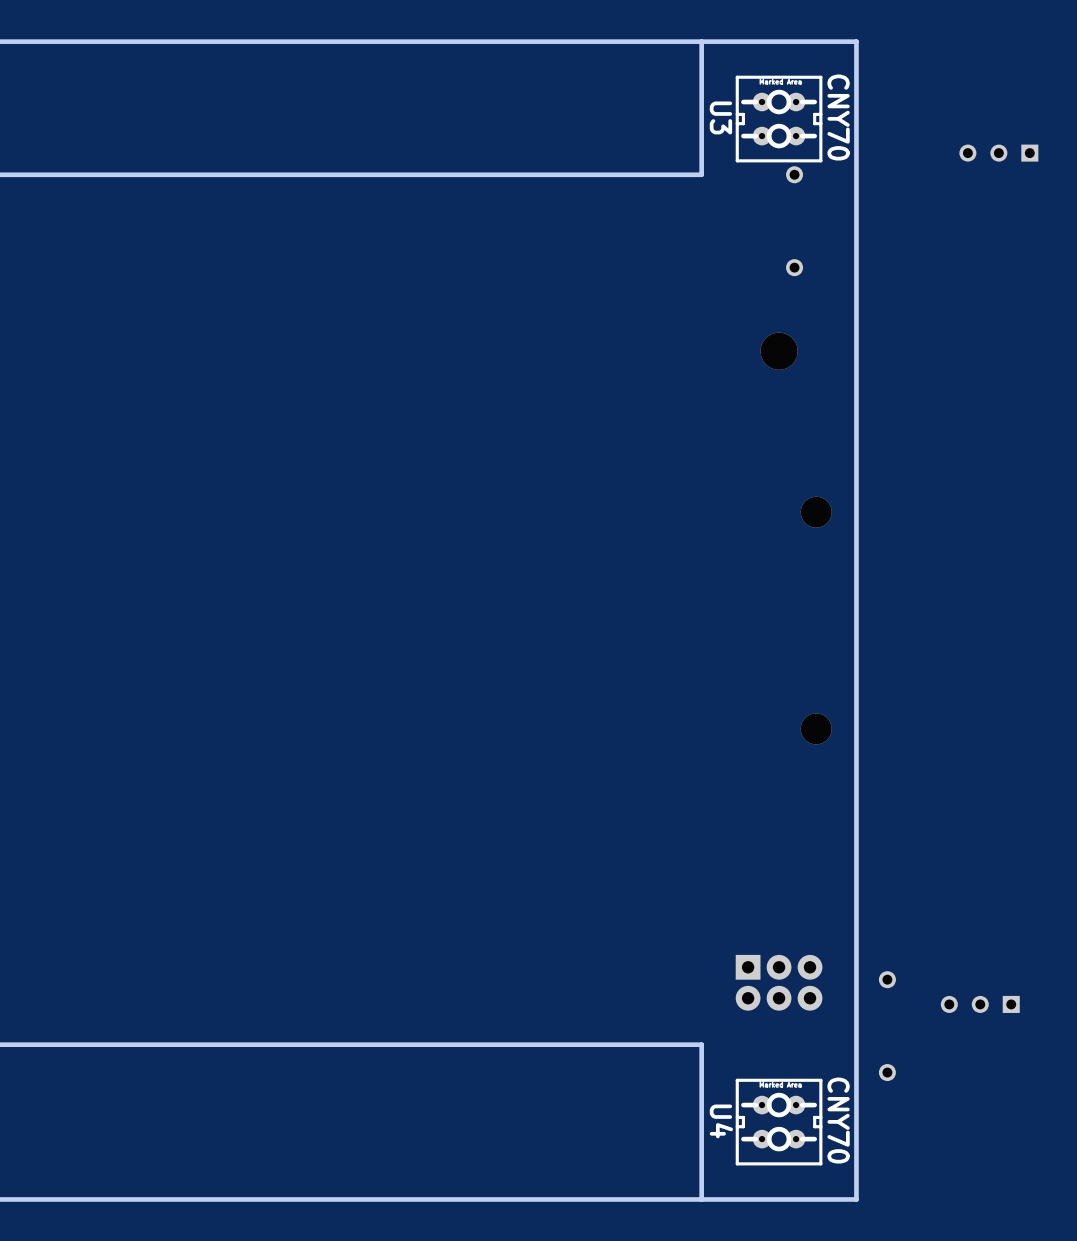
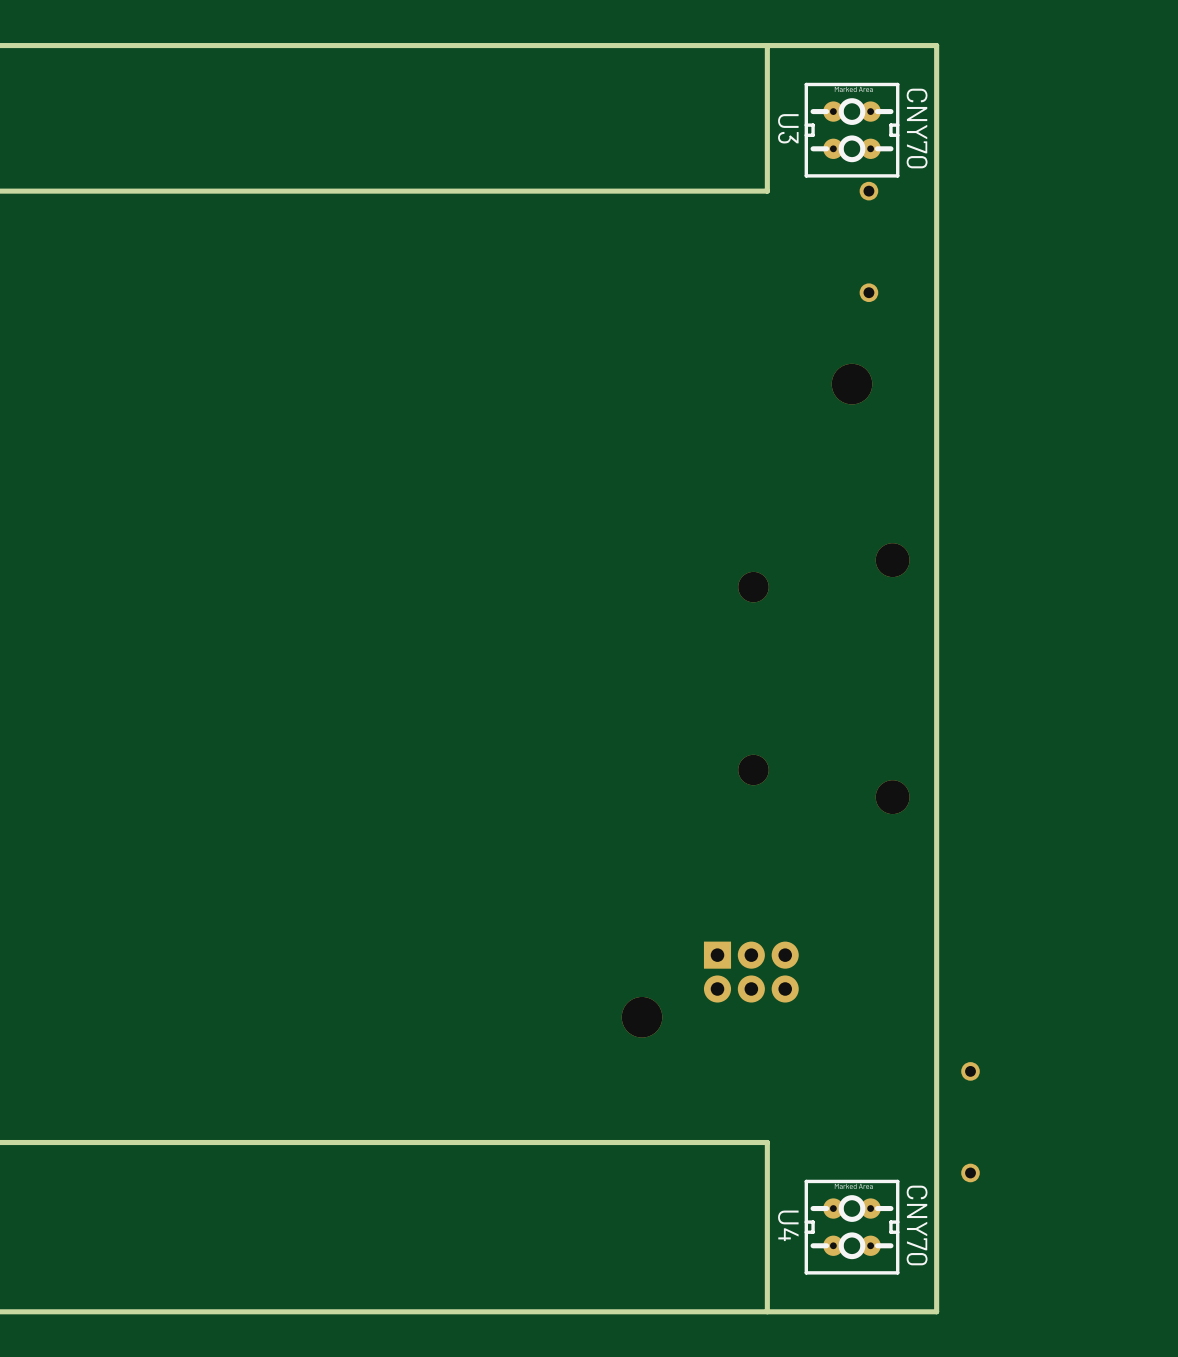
part: (998, 153) -> none
part: none -> (753, 587)
part: none -> (753, 770)
part: none -> (642, 1017)
part position: (779, 982) -> (751, 972)
part: (980, 1004) -> none

